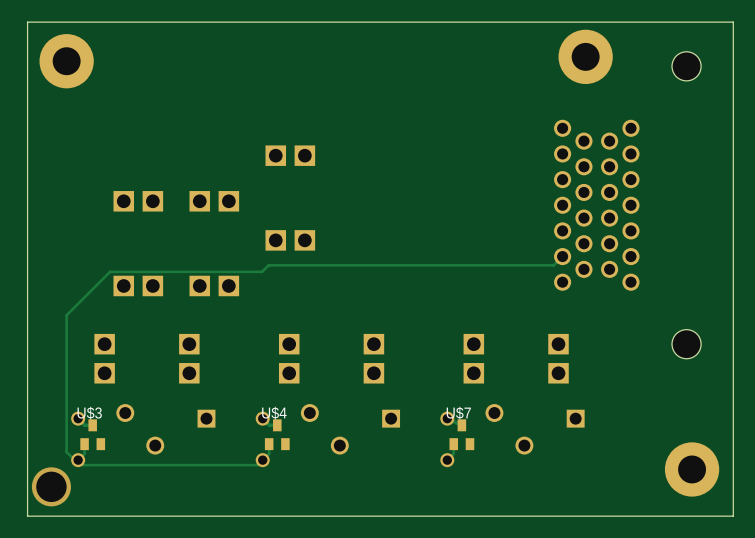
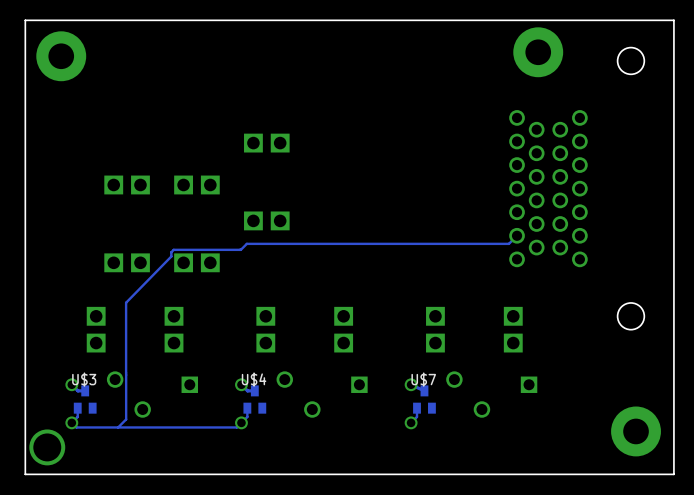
track: (189, 271) (110, 271) (66, 315) (66, 452) (74, 460) (78, 460) -> (173, 249) (171, 256) (126, 302) (126, 419) (118, 427)

